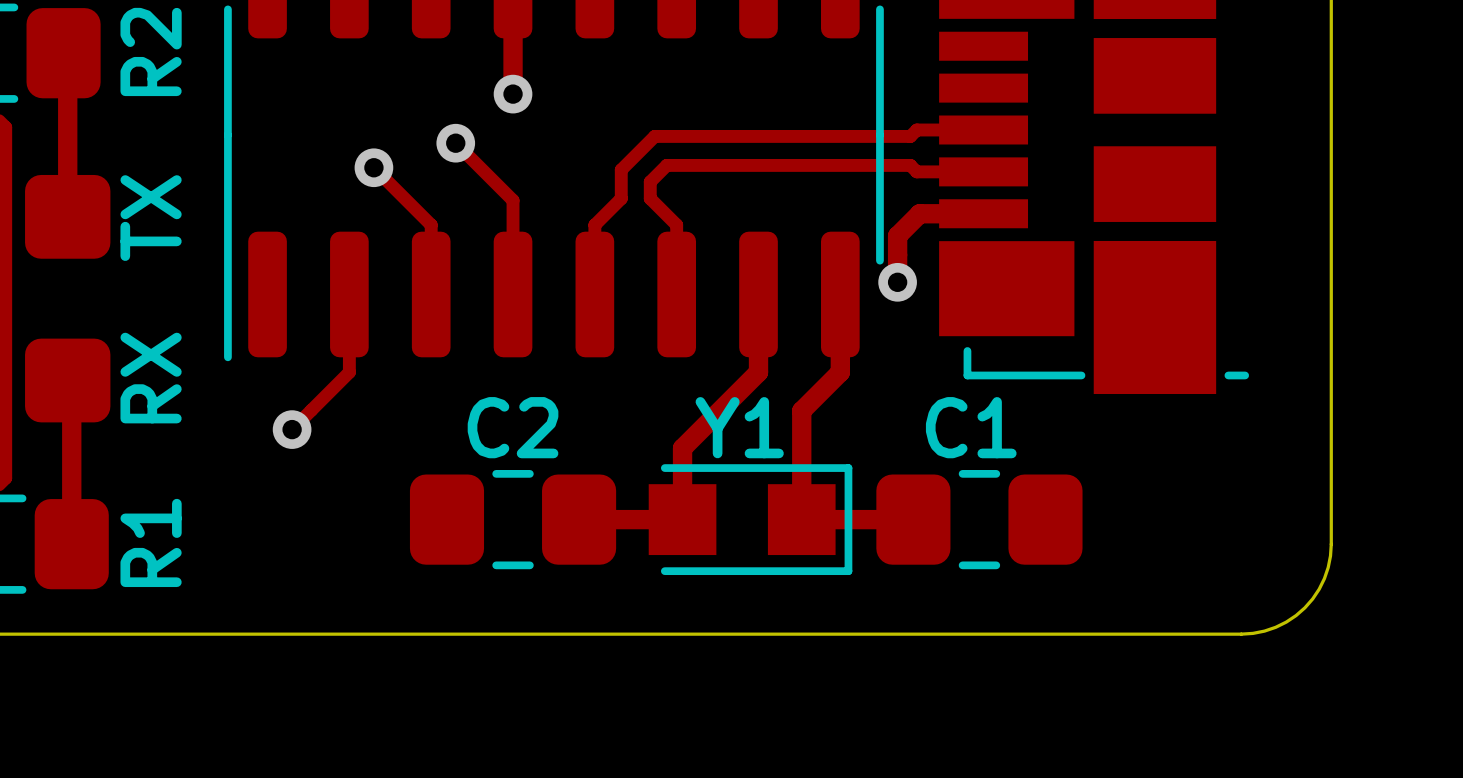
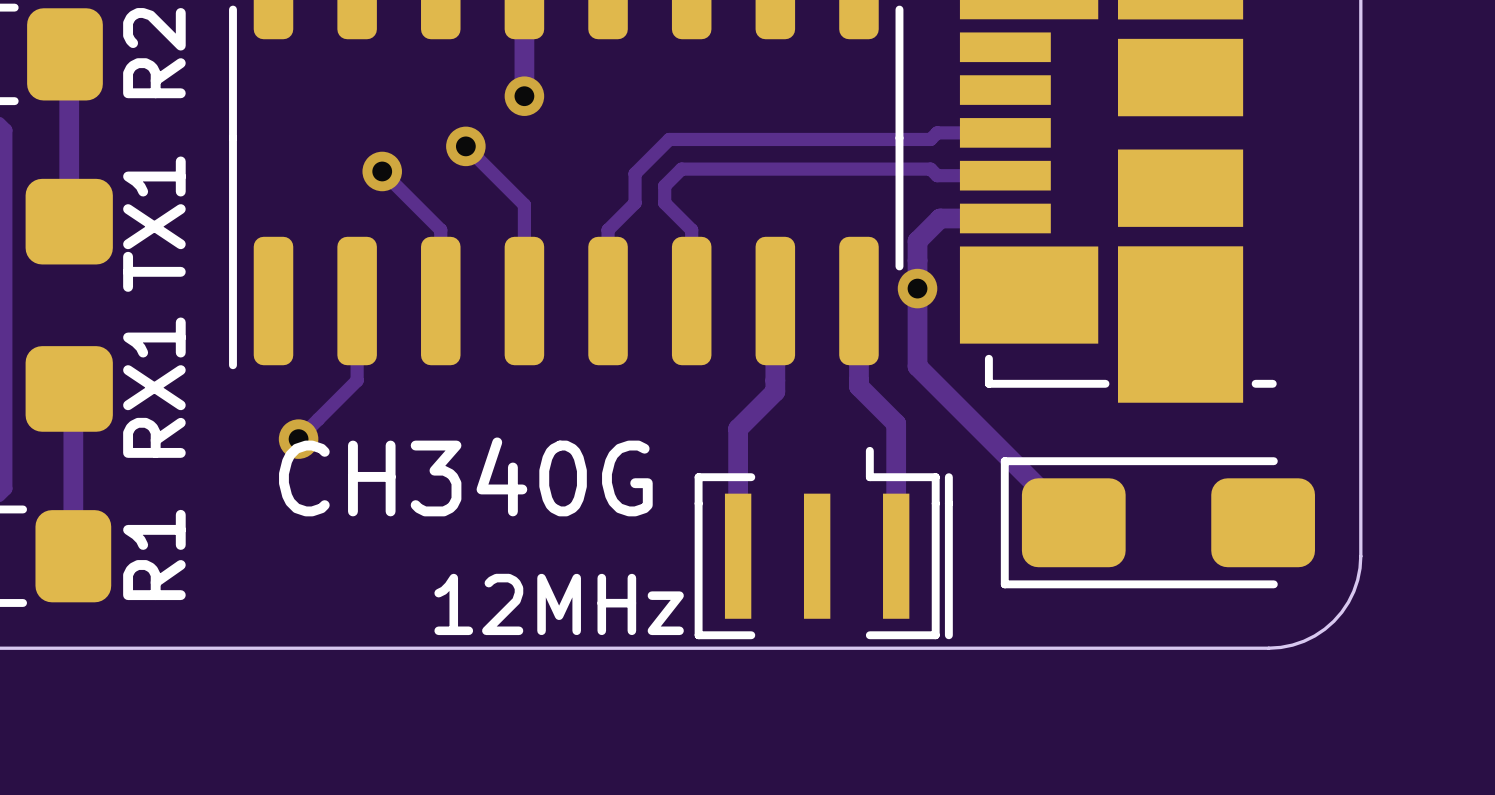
TX name: TX (151, 218) -> TX1 (154, 224)
track: none -> (917, 288) (917, 366) (1073, 522)
track: (758, 372) (682, 448) (682, 519) (579, 519) -> (775, 380) (775, 391) (738, 428) (738, 506)
track: (840, 372) (801, 410) (801, 519) (913, 519) -> (858, 380) (858, 386) (896, 423) (896, 506)
RX name: RX (151, 378) -> RX1 (154, 387)
CH340G name: none -> CH340G (465, 476)
part: none -> (1157, 522)
C2: (513, 519) -> none
Y1: (750, 519) -> none
C1: (979, 519) -> none
12MHz: none -> (823, 543)

